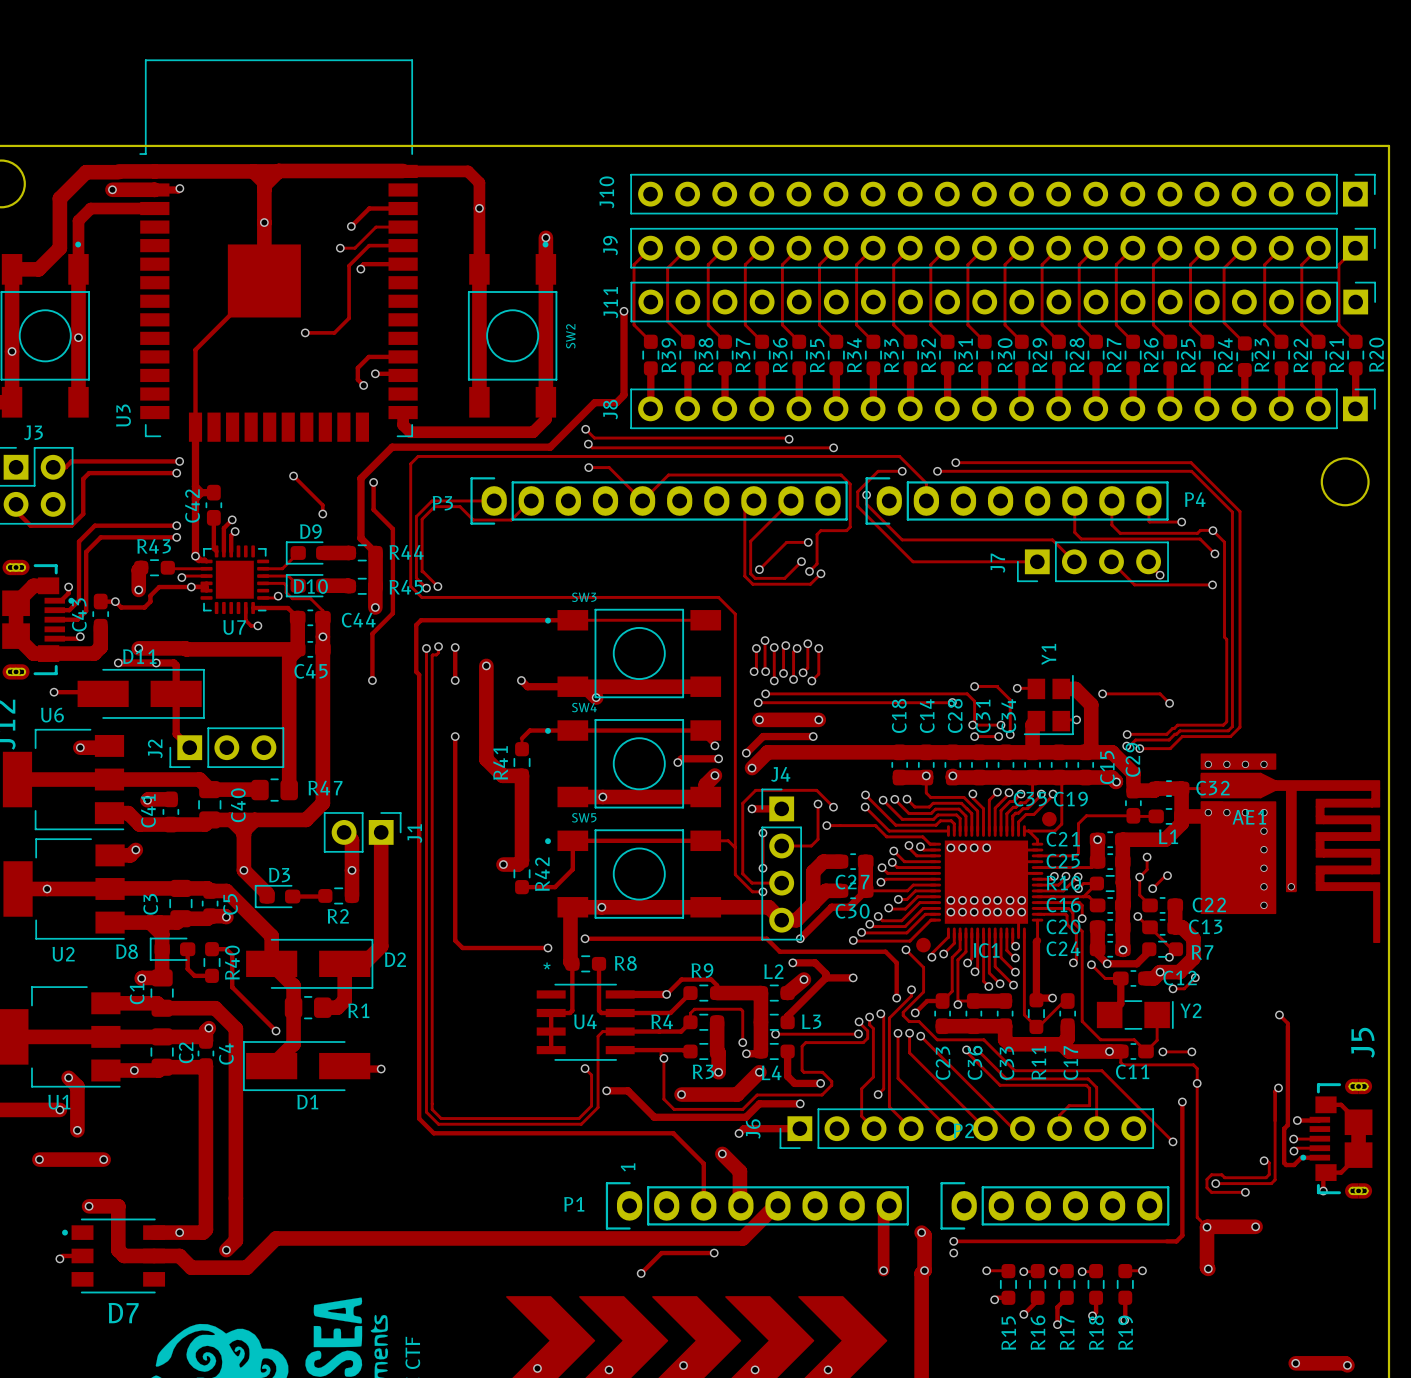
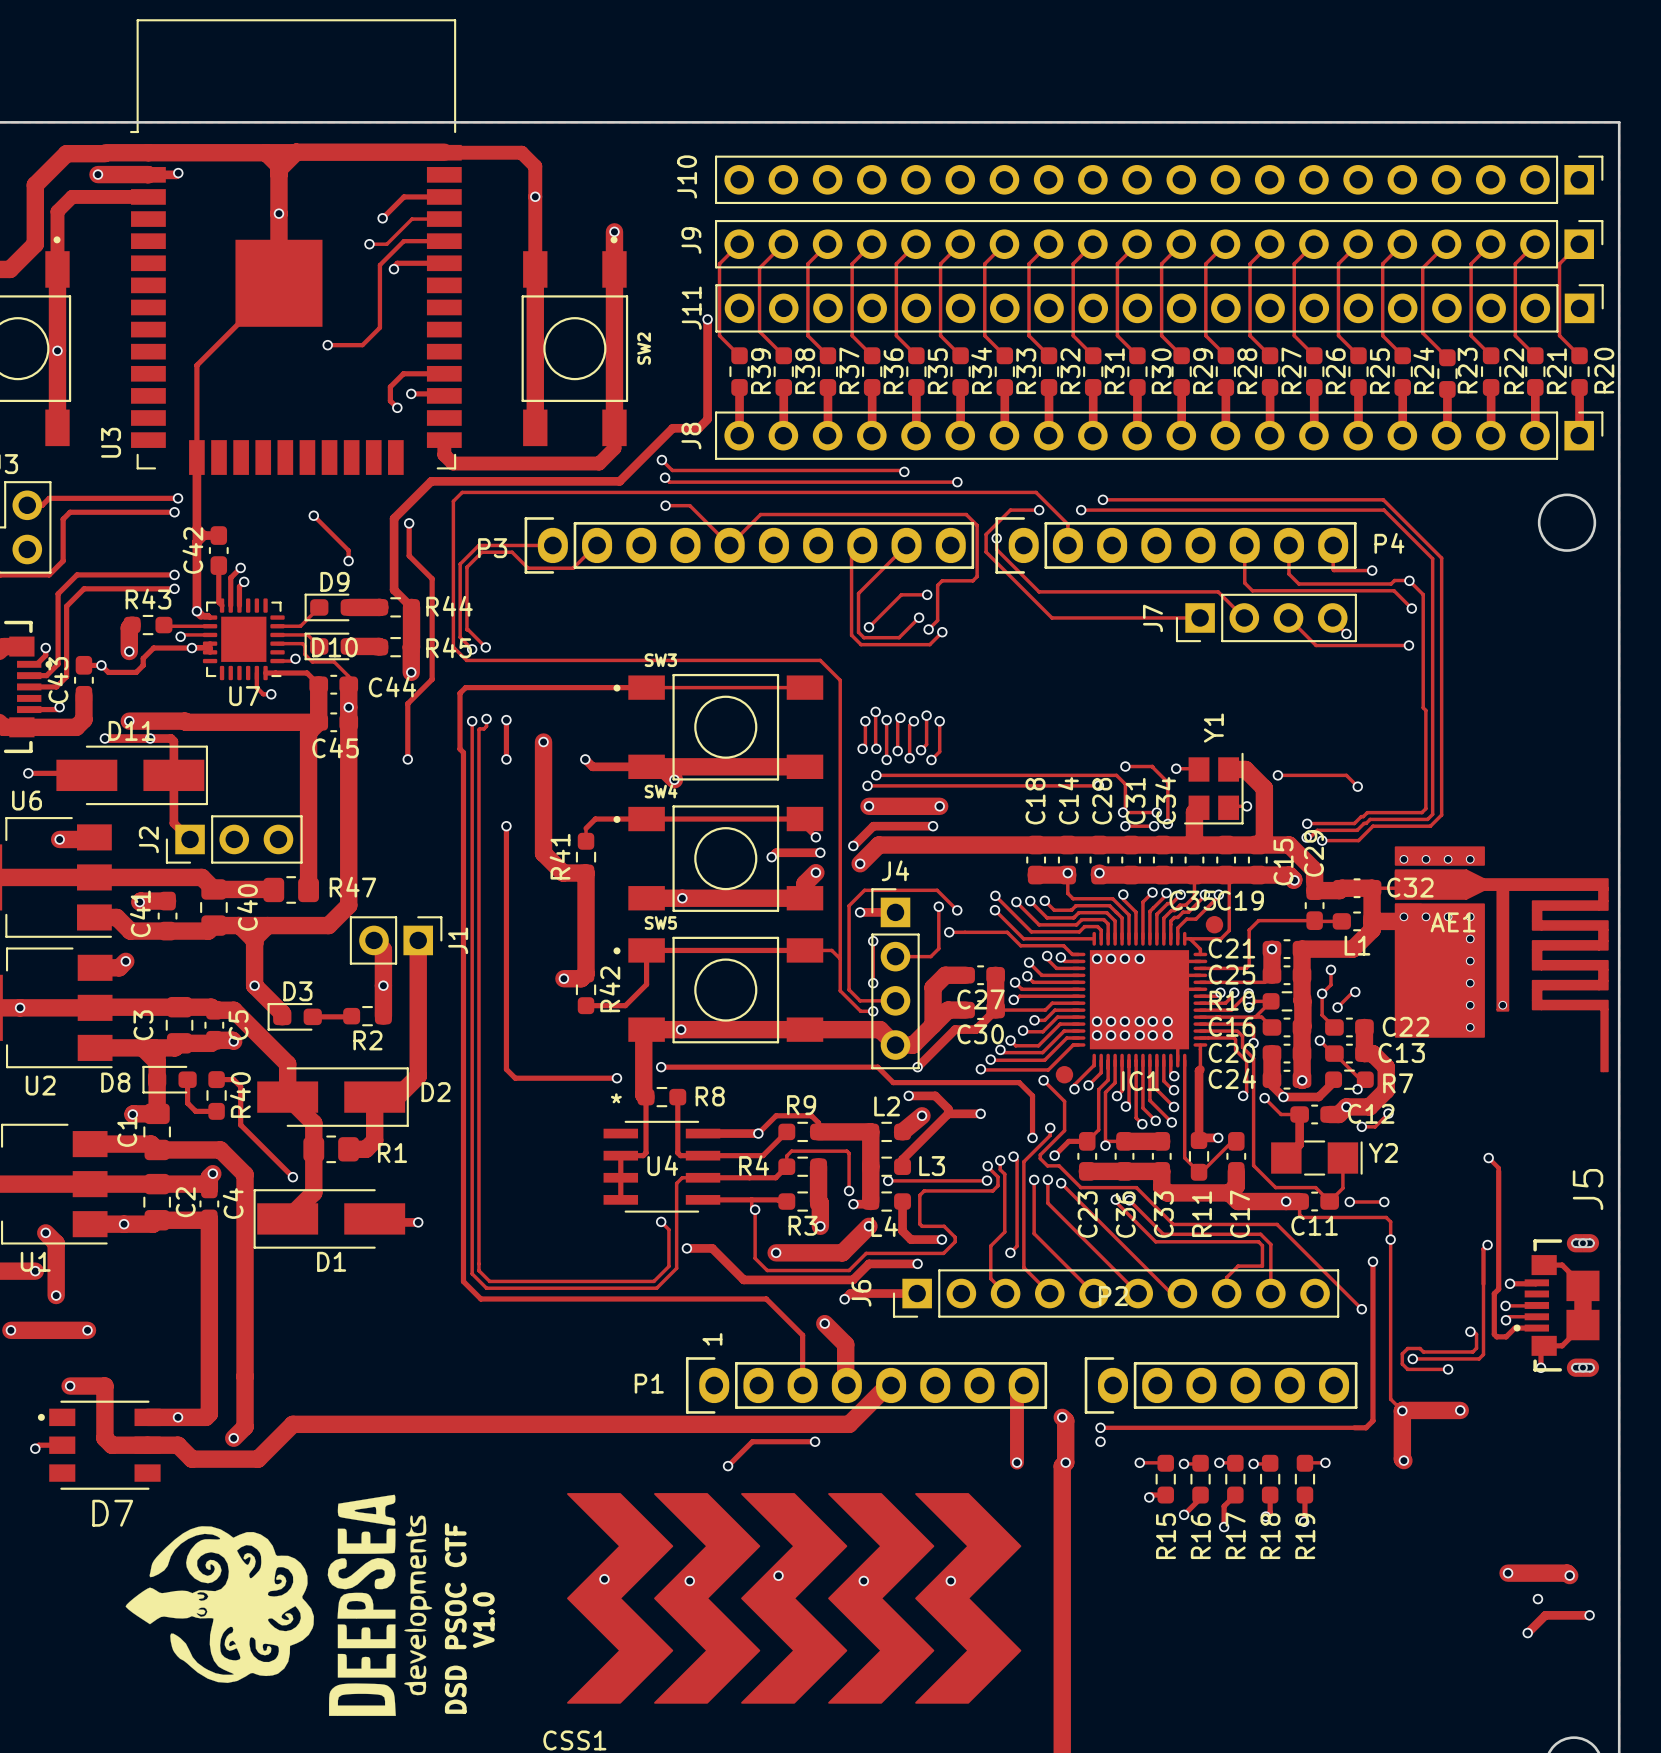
via: (1021, 900) -> none
via: (1021, 912) -> none

